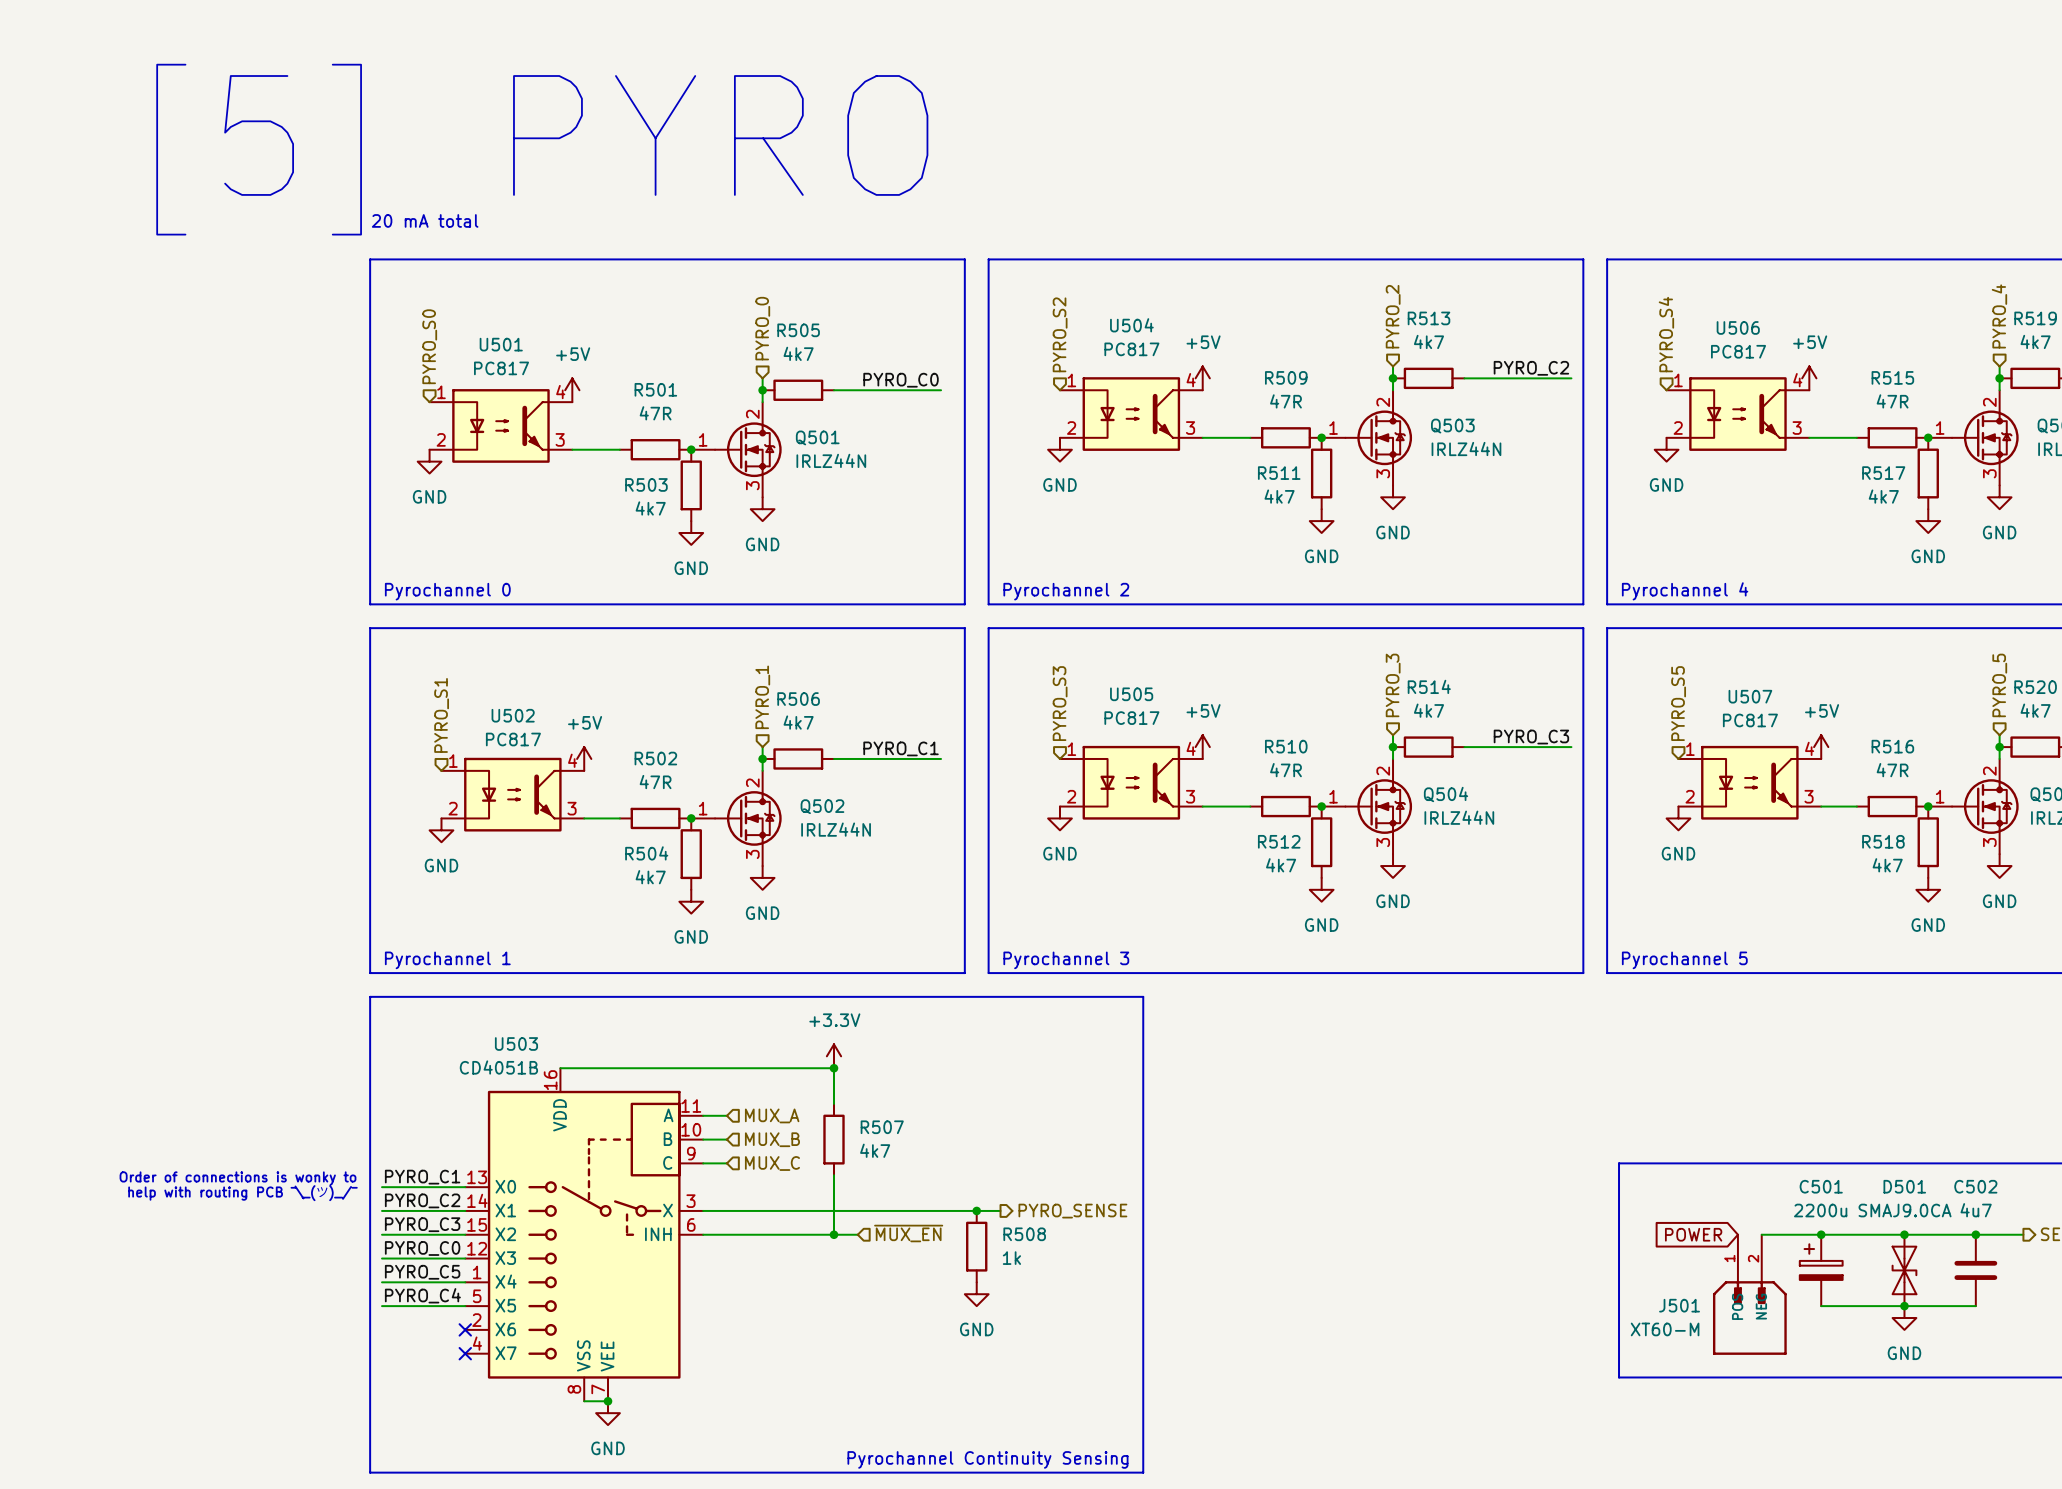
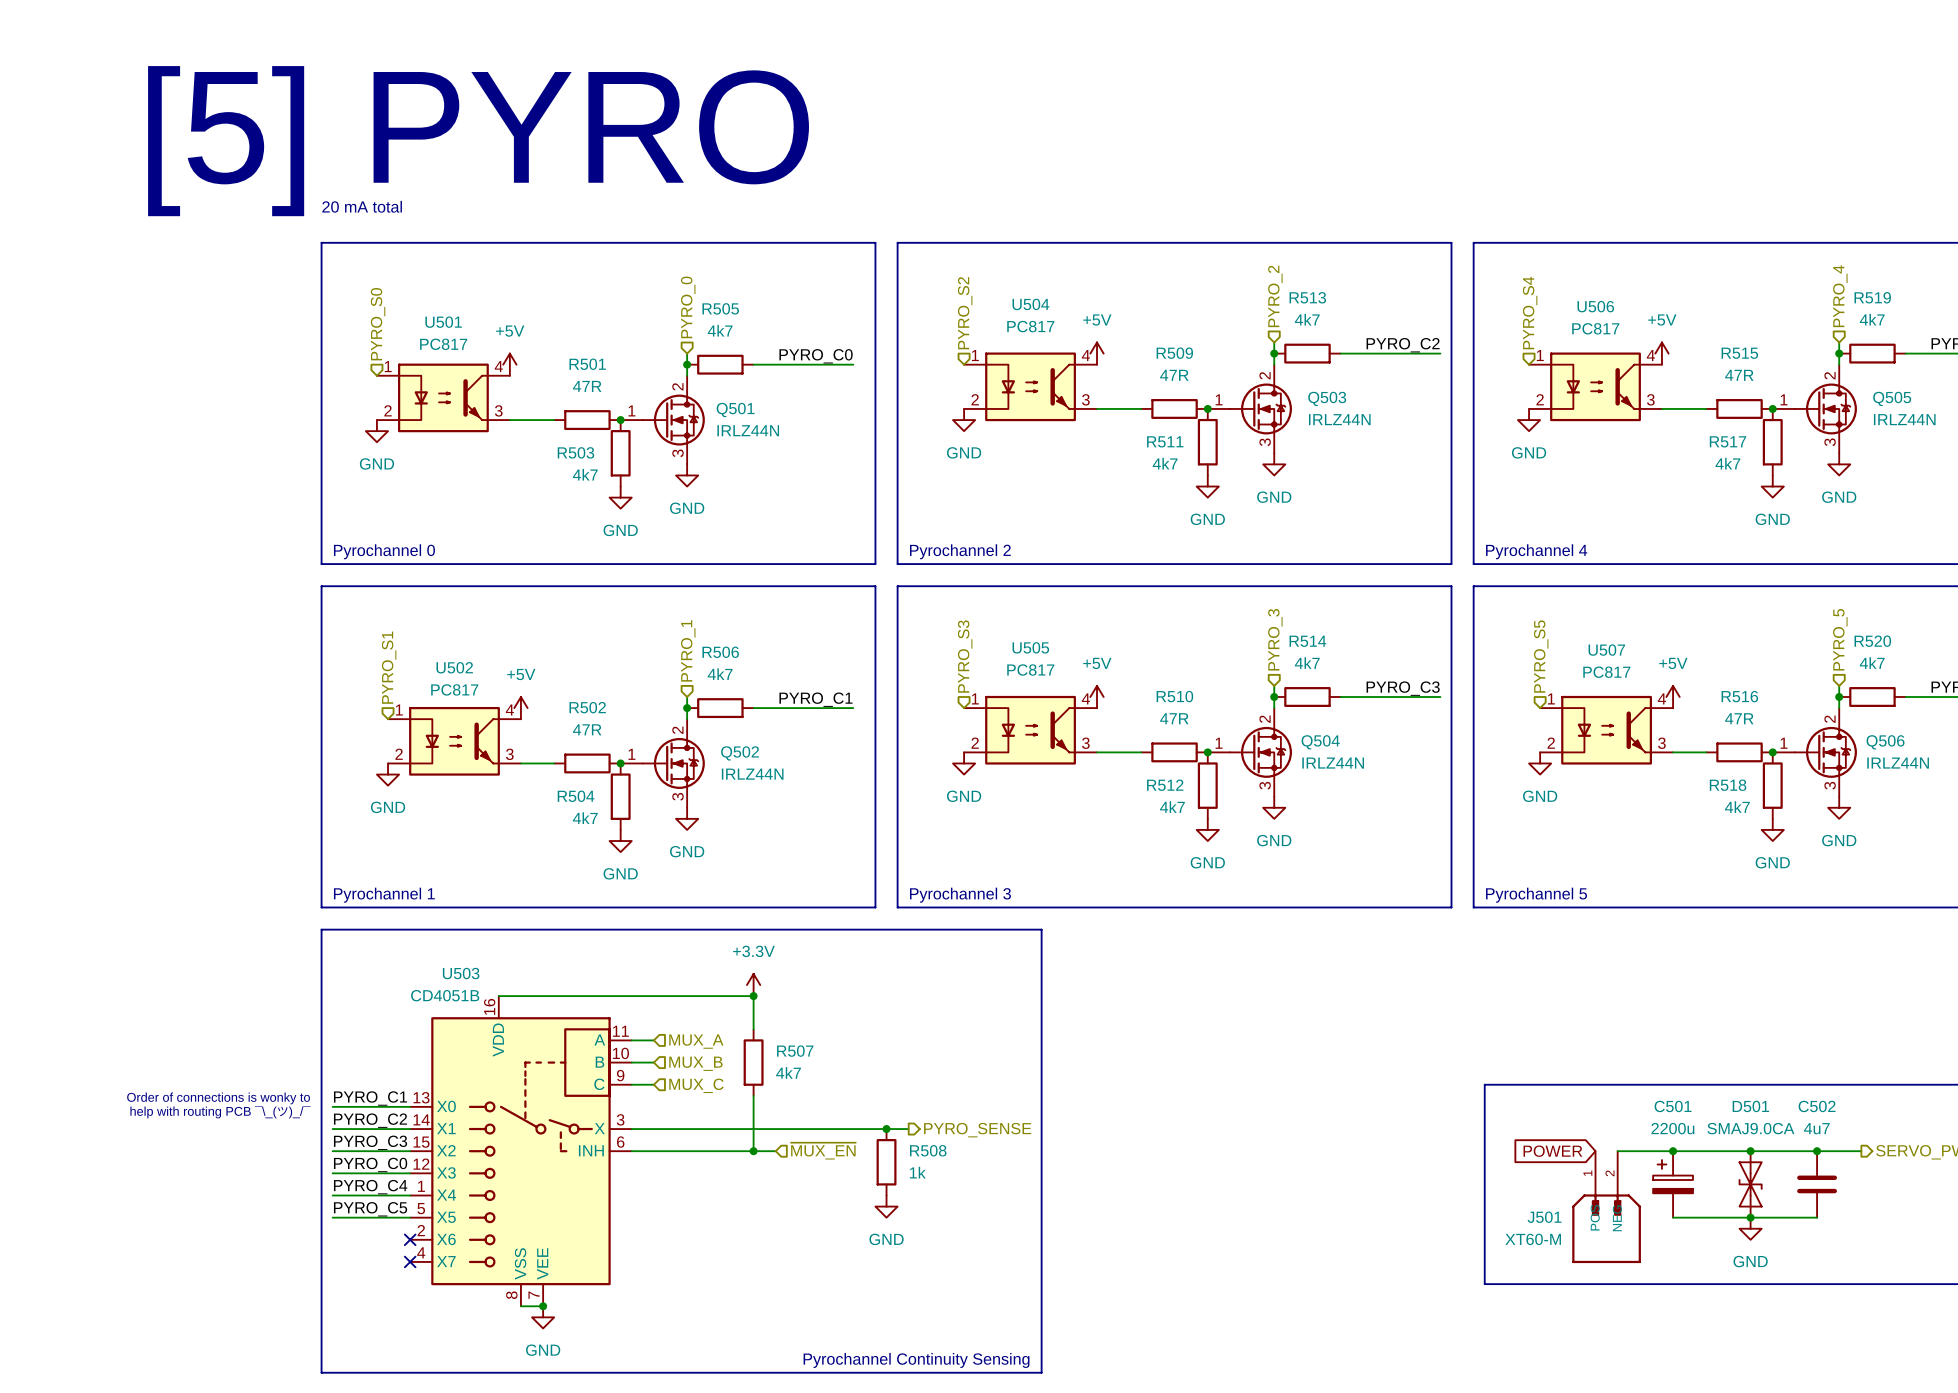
label: PYRO_C5 (422, 1272) -> PYRO_C4 (370, 1187)
label: PYRO_C4 (422, 1295) -> PYRO_C5 (370, 1209)

